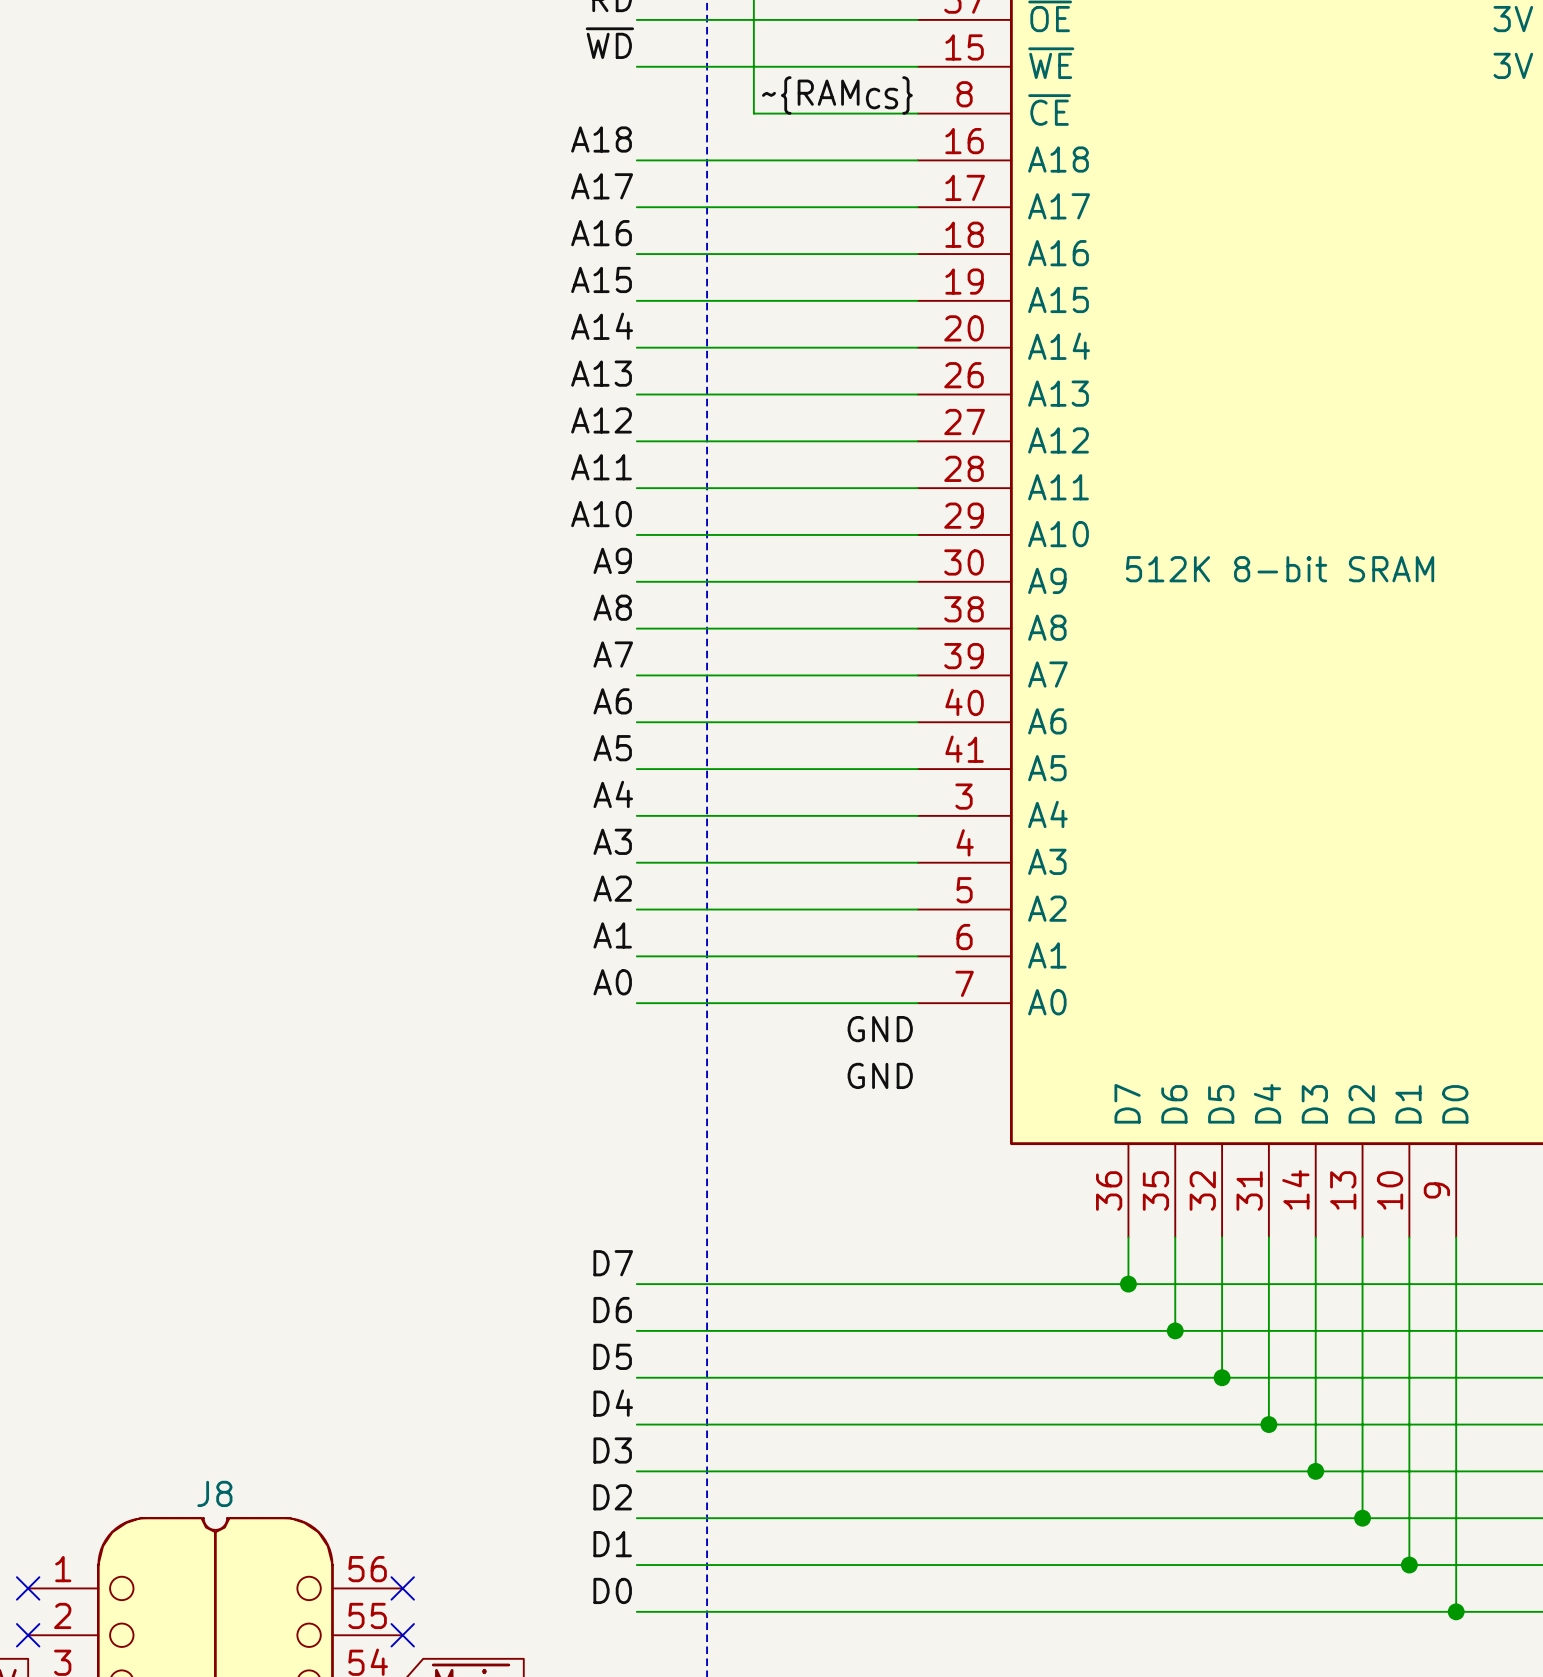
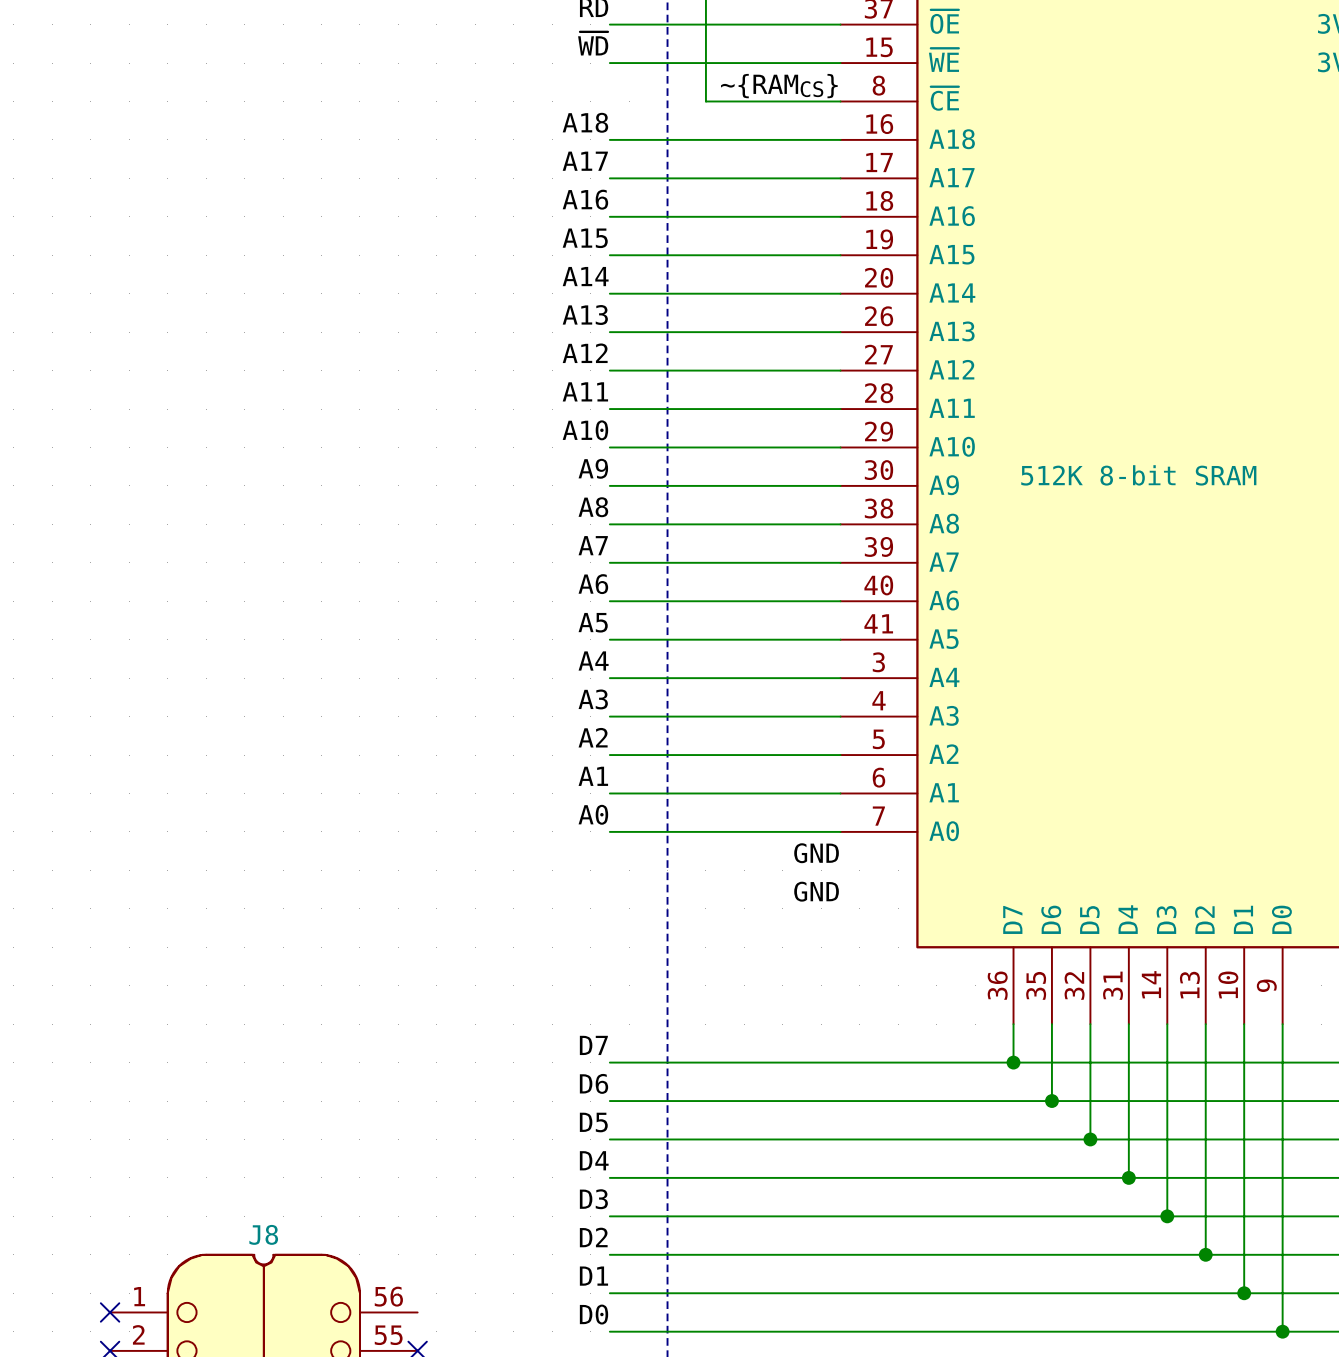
no-connect mark: (402, 1588) -> none

